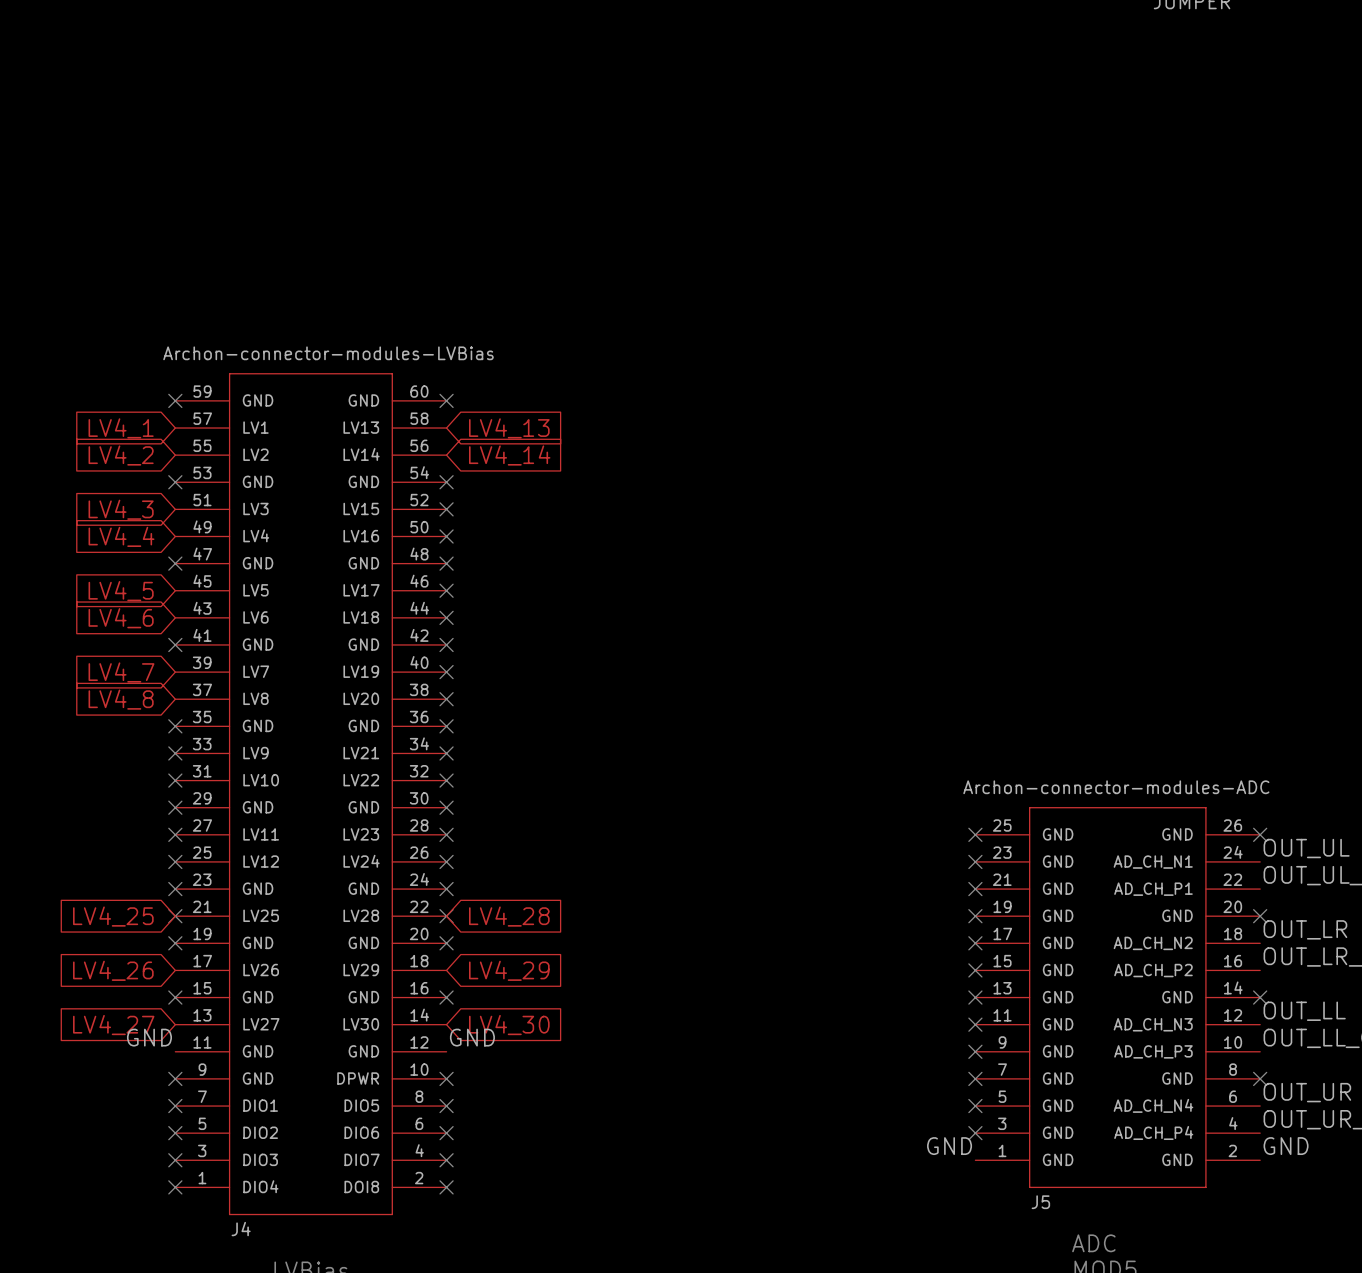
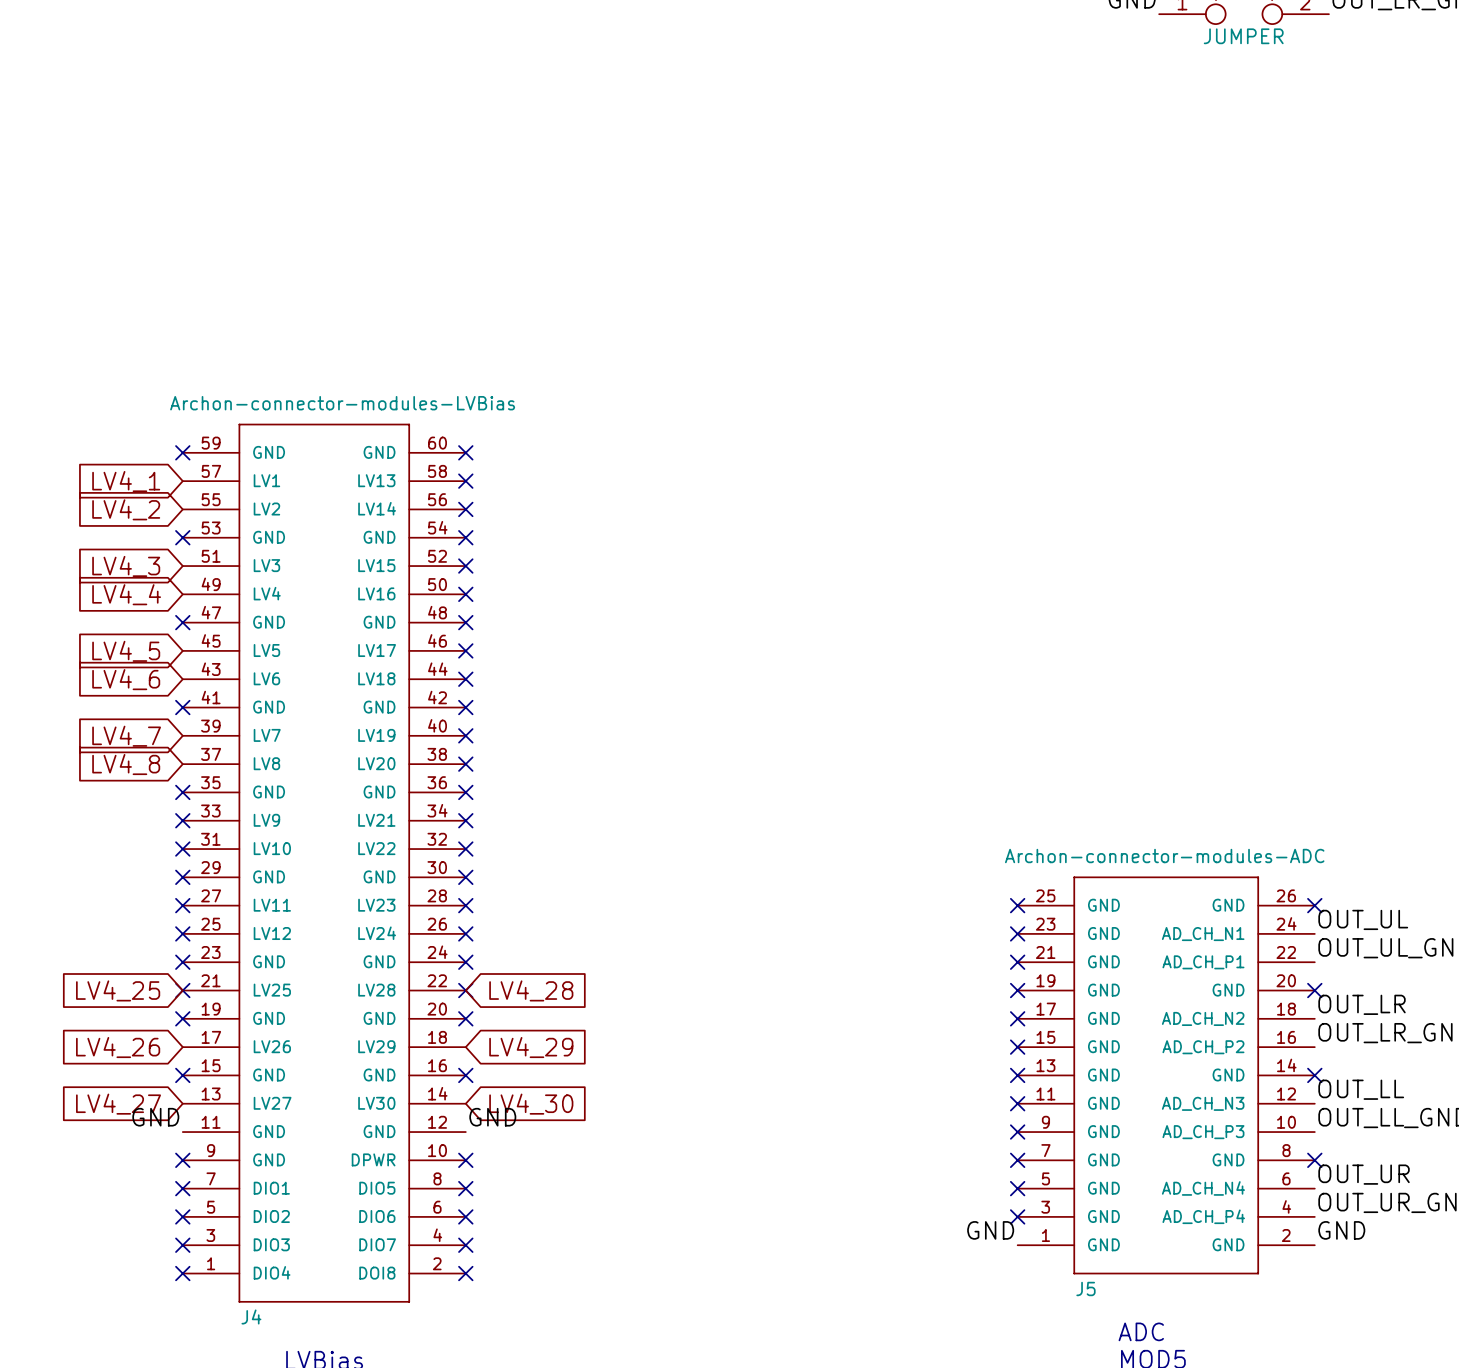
no-connect mark: none -> (465, 481)
global label: LV4_13 (509, 428) -> none
no-connect mark: none -> (465, 509)
global label: LV4_14 (509, 455) -> none

